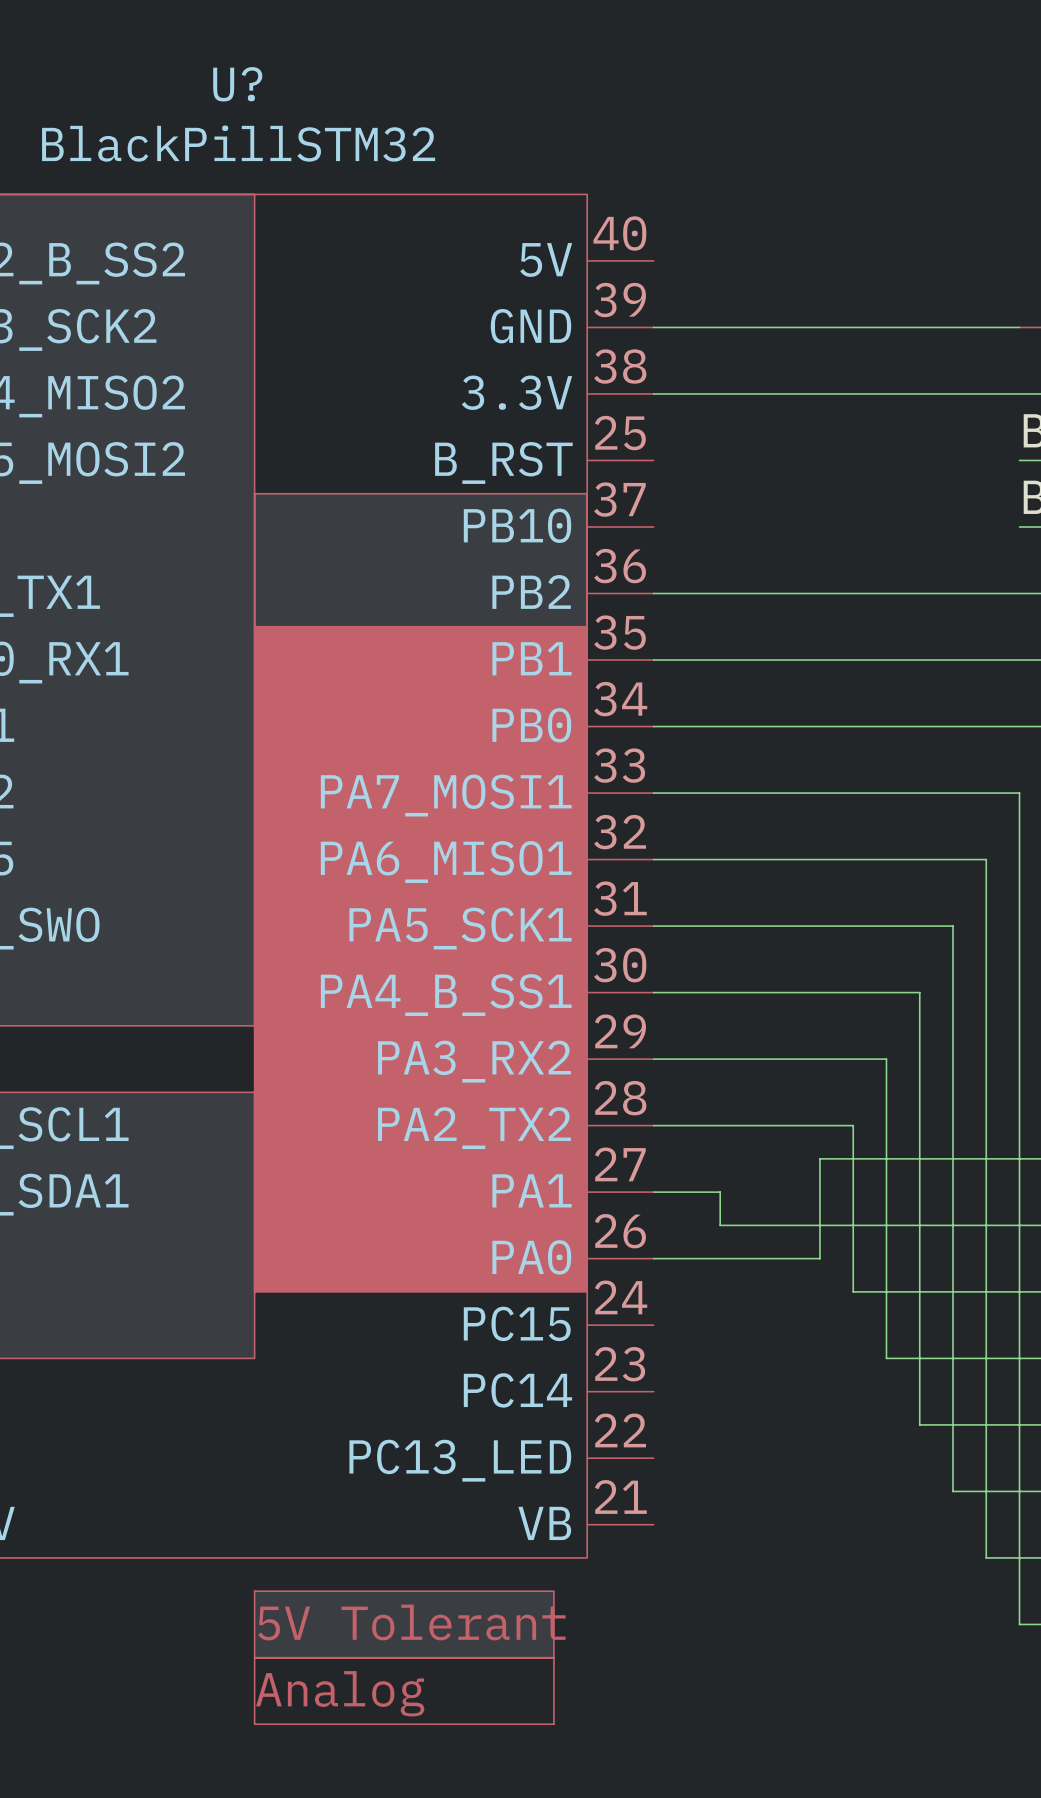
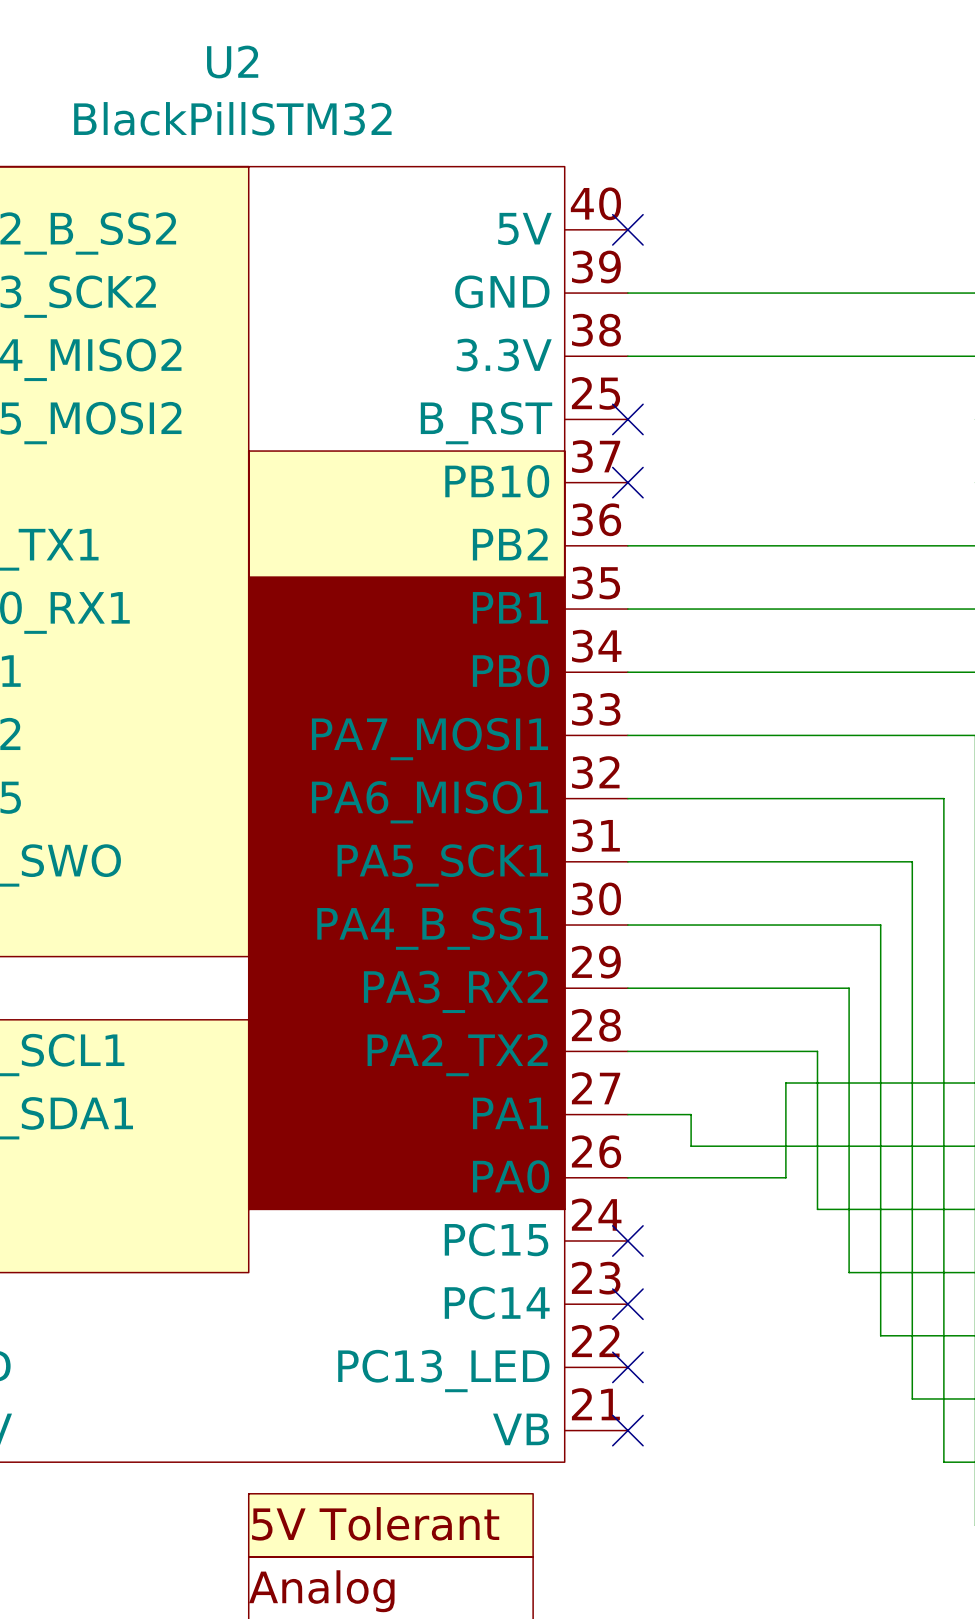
U? name: U? (237, 84) -> U2 (232, 62)
no-connect mark: none -> (627, 229)
no-connect mark: none -> (627, 419)
no-connect mark: none -> (627, 482)
no-connect mark: none -> (627, 1240)
no-connect mark: none -> (627, 1304)
no-connect mark: none -> (627, 1367)
no-connect mark: none -> (627, 1430)

